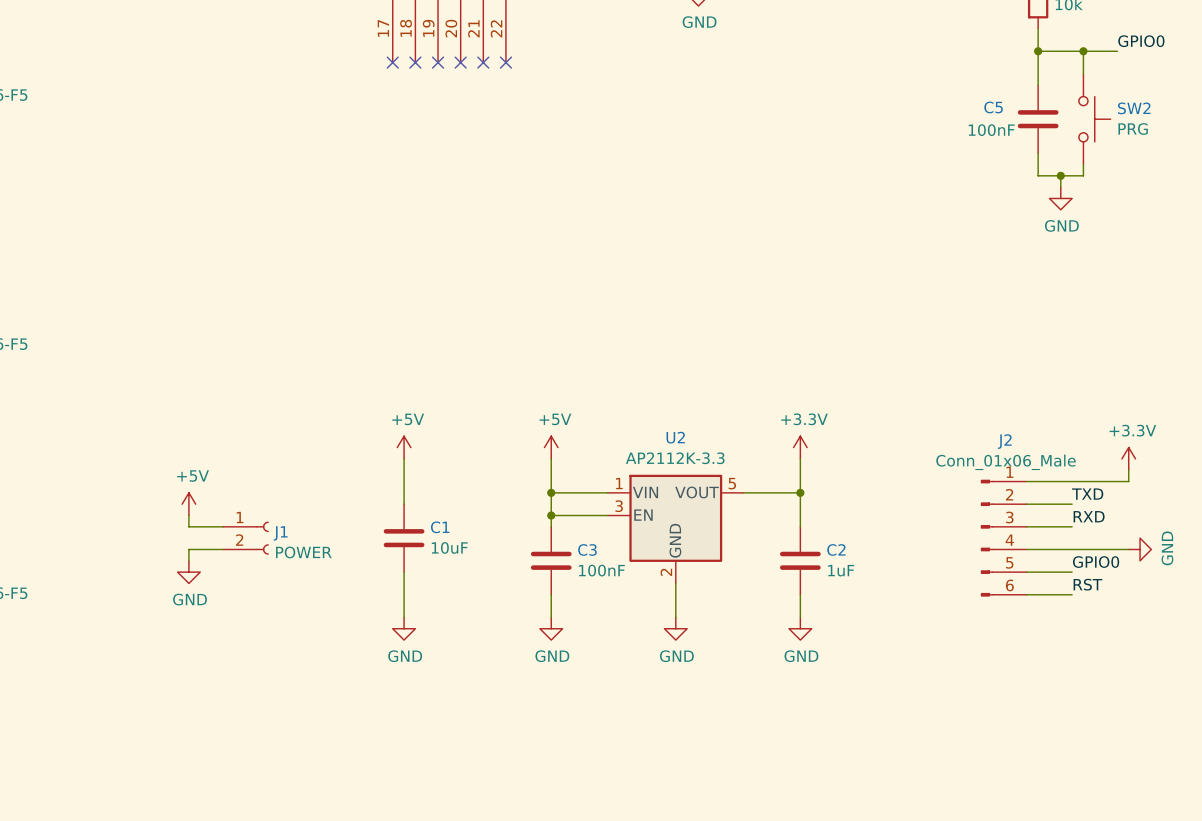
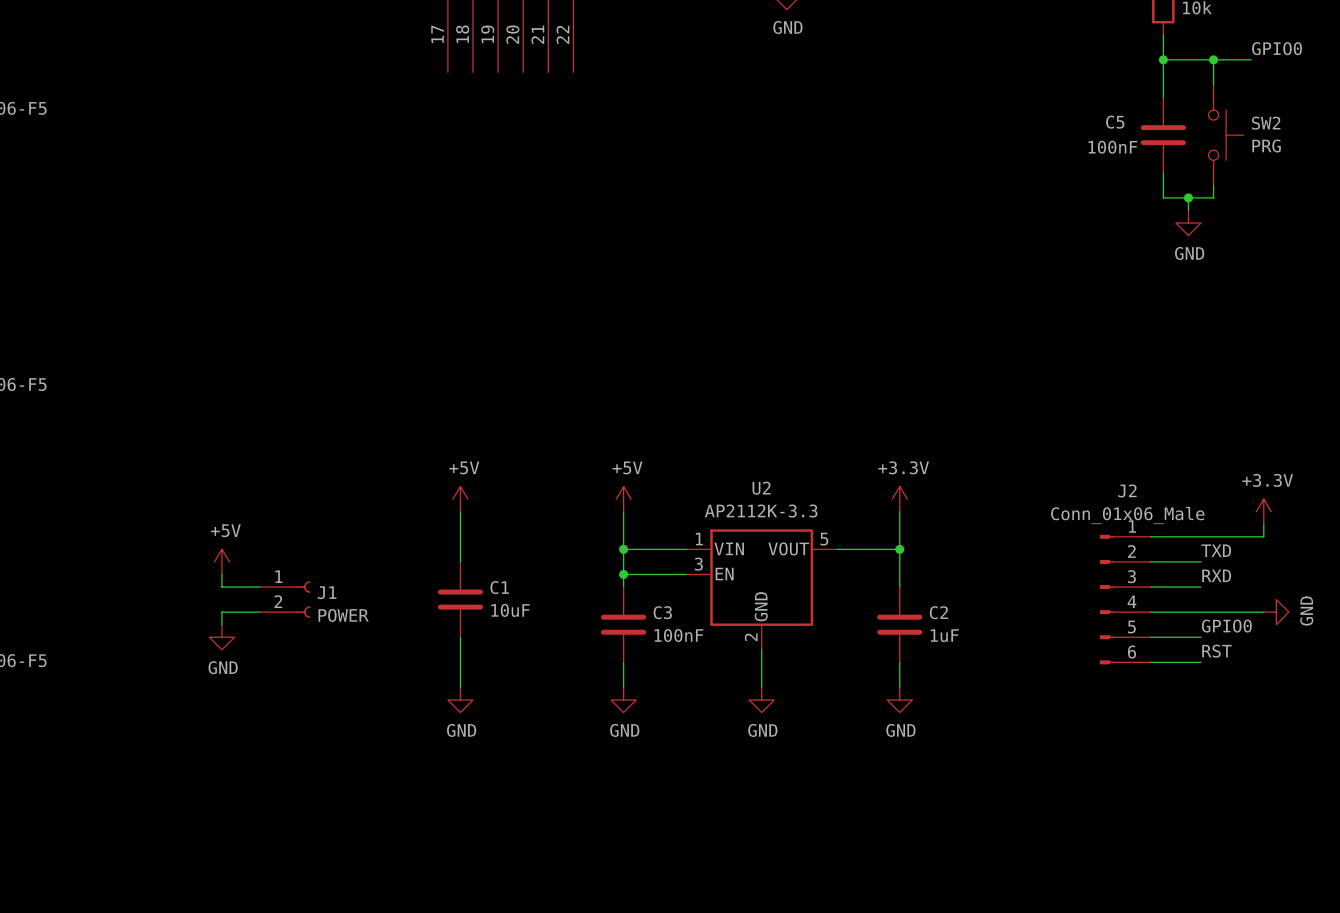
no-connect mark: (392, 62) -> none
no-connect mark: (415, 62) -> none
no-connect mark: (438, 62) -> none
no-connect mark: (460, 62) -> none
no-connect mark: (483, 62) -> none
no-connect mark: (505, 62) -> none

